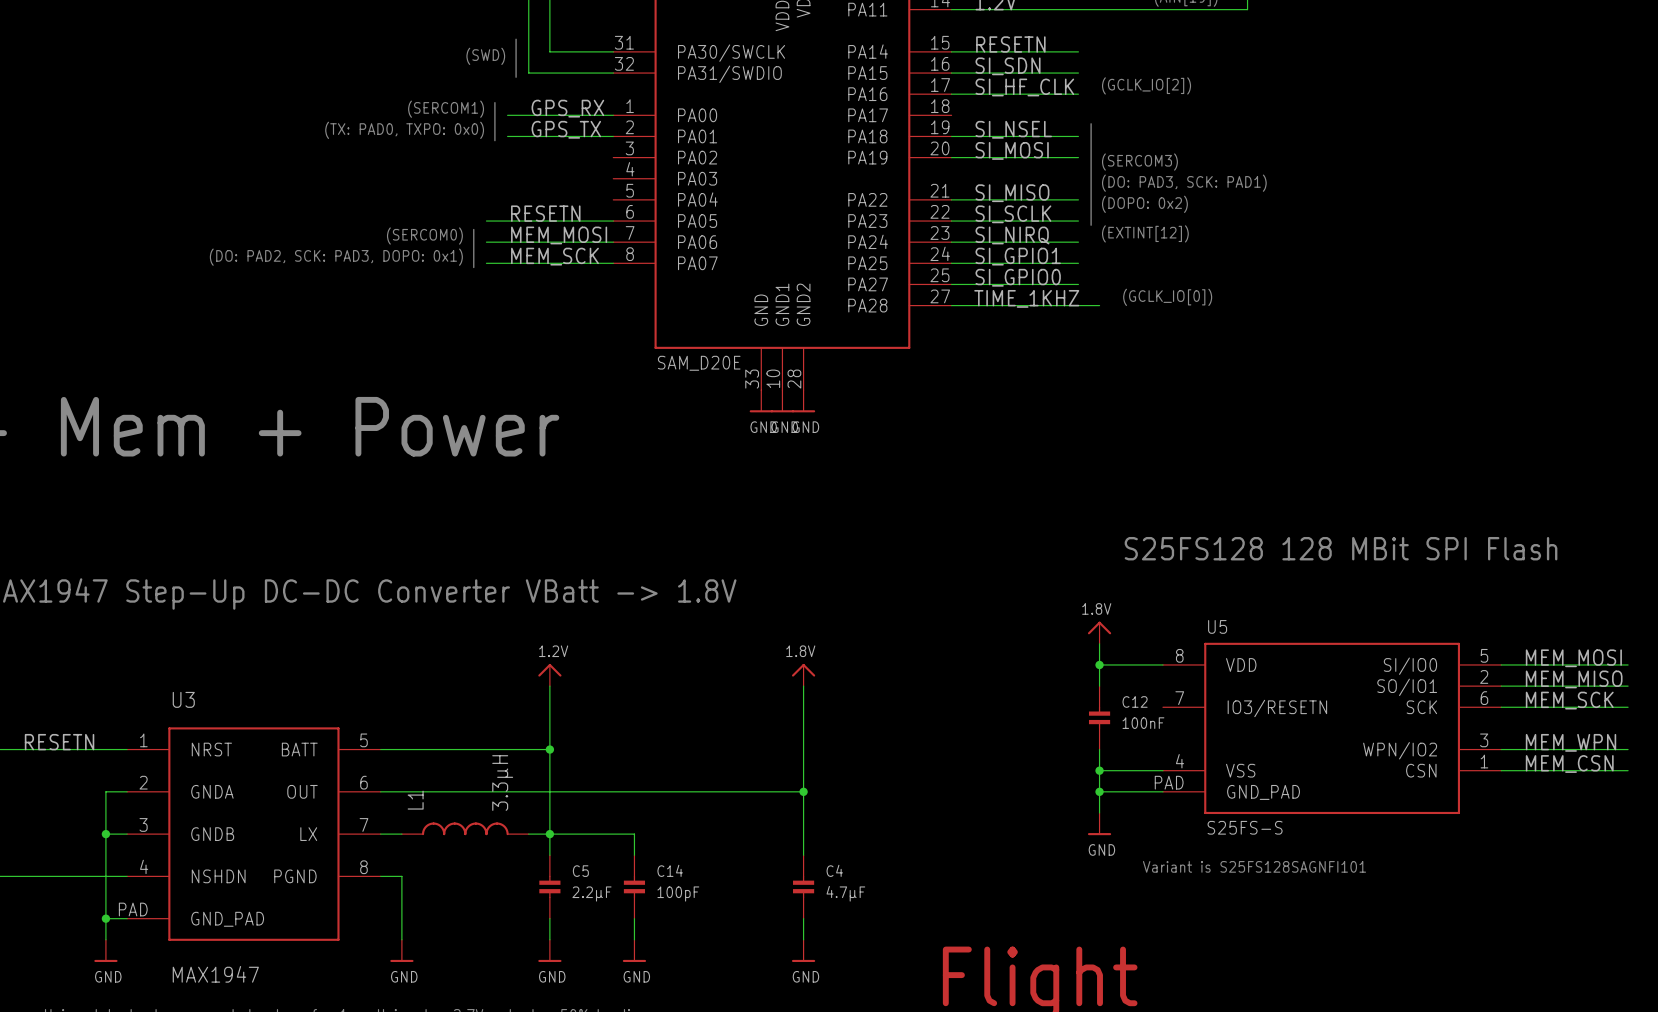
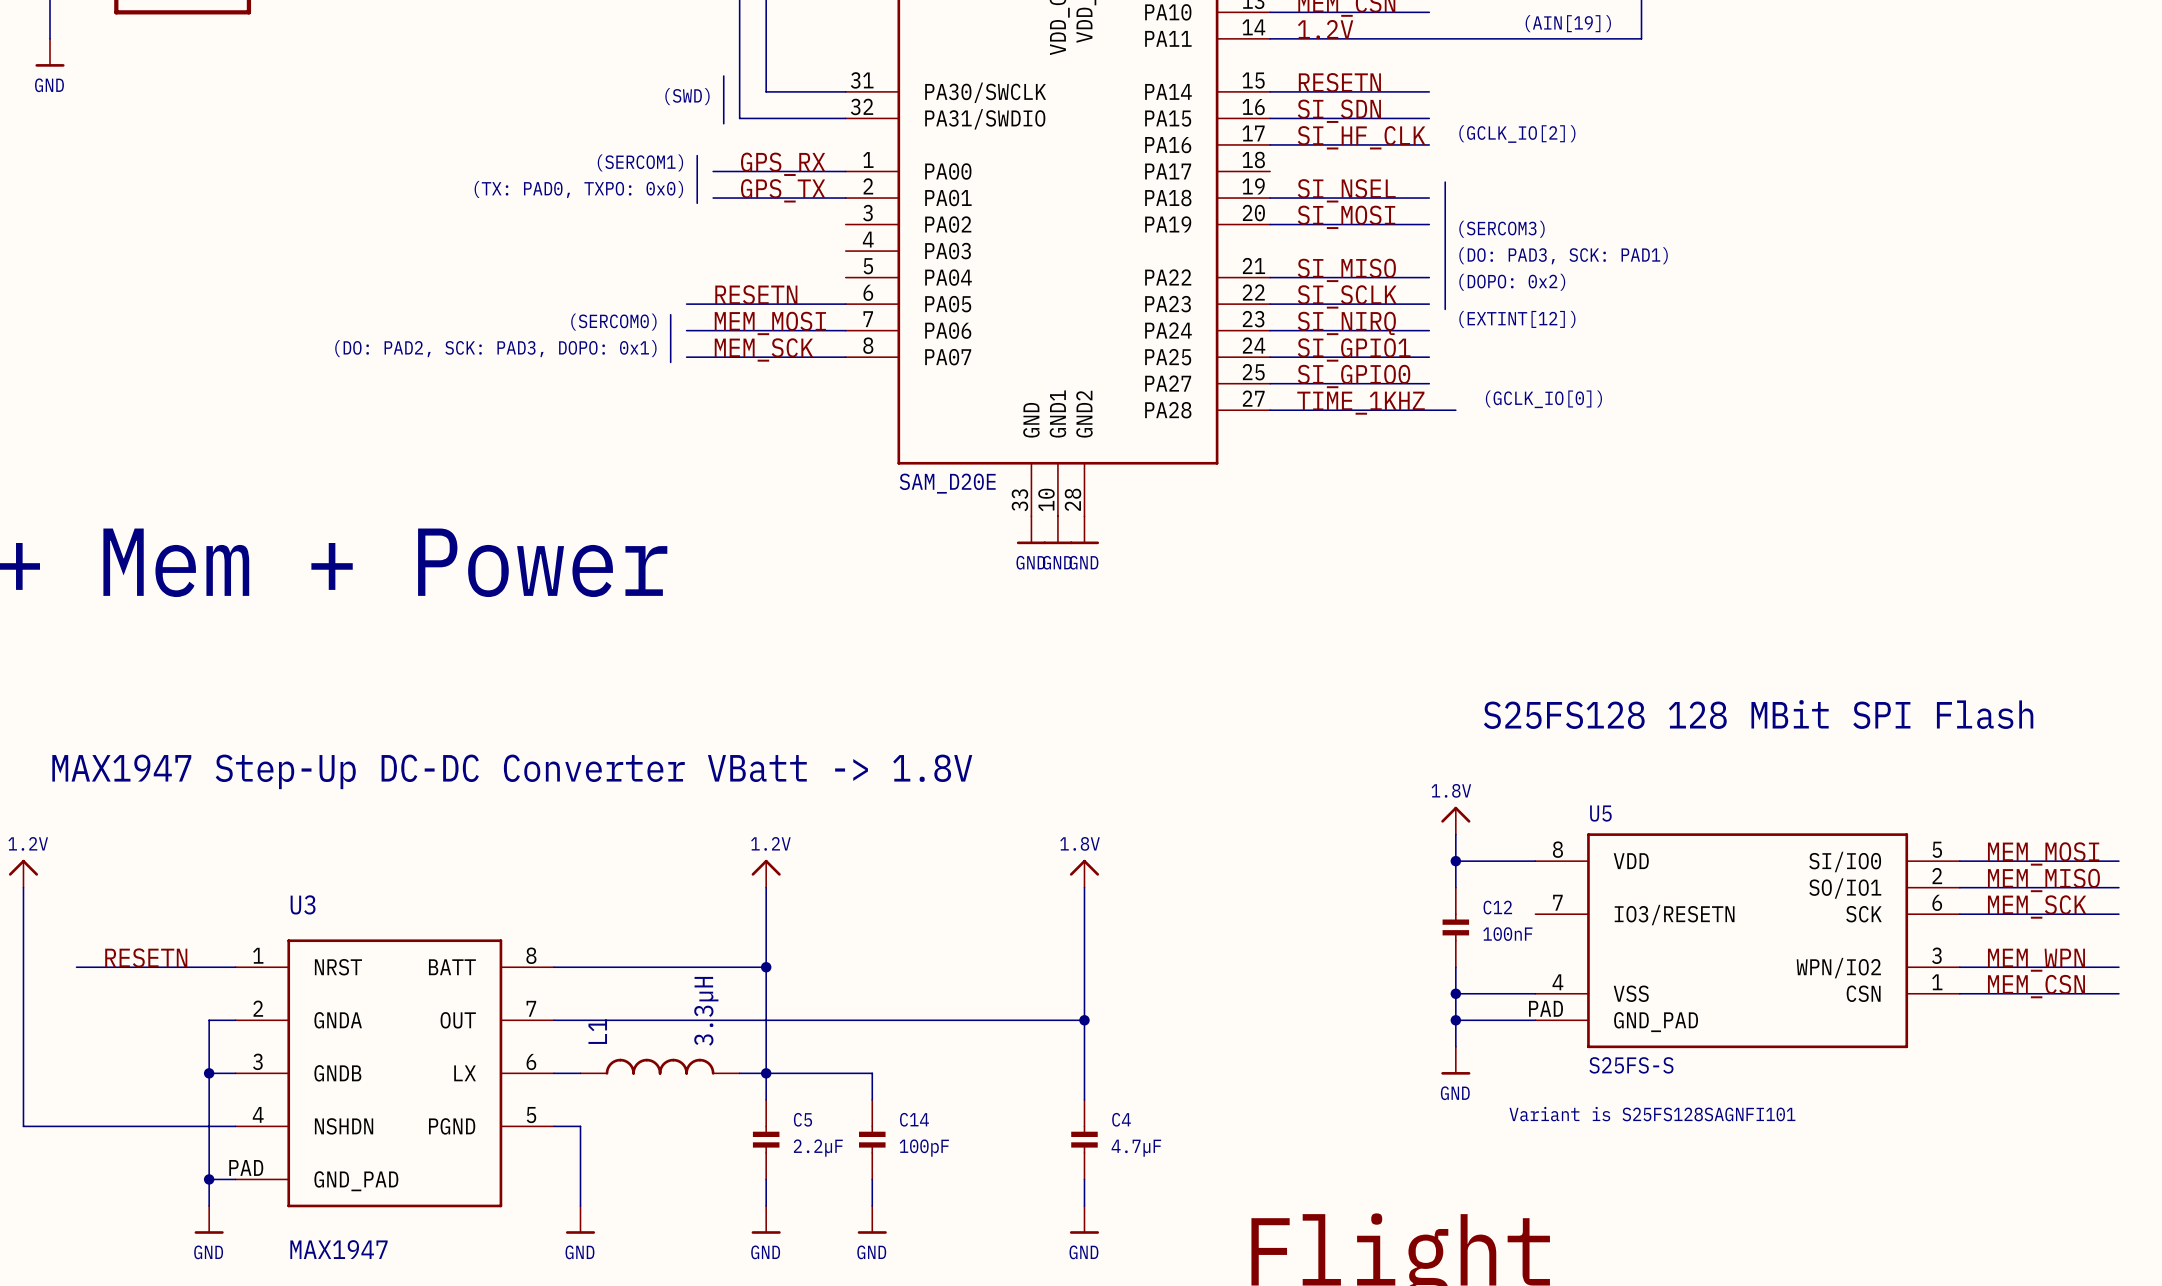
U3 pin number: 5 (363, 740) -> 8 (531, 955)
U3 pin number: 6 (363, 782) -> 7 (531, 1008)
U3 pin number: 7 (363, 824) -> 6 (531, 1061)
U3 pin number: 8 (363, 867) -> 5 (531, 1115)

